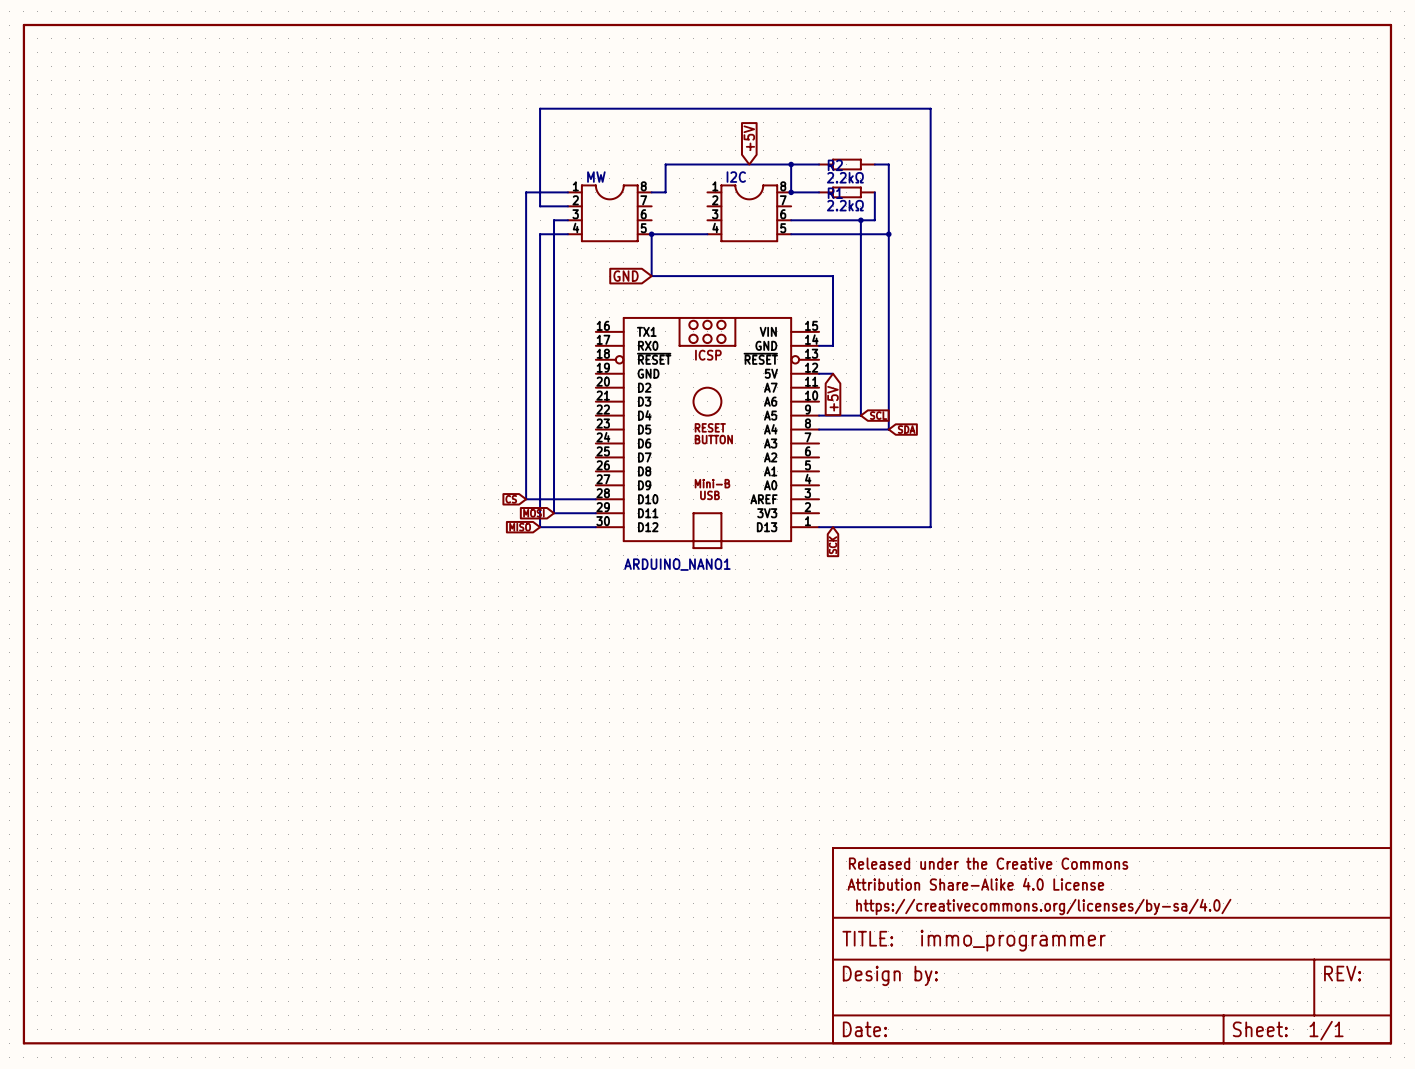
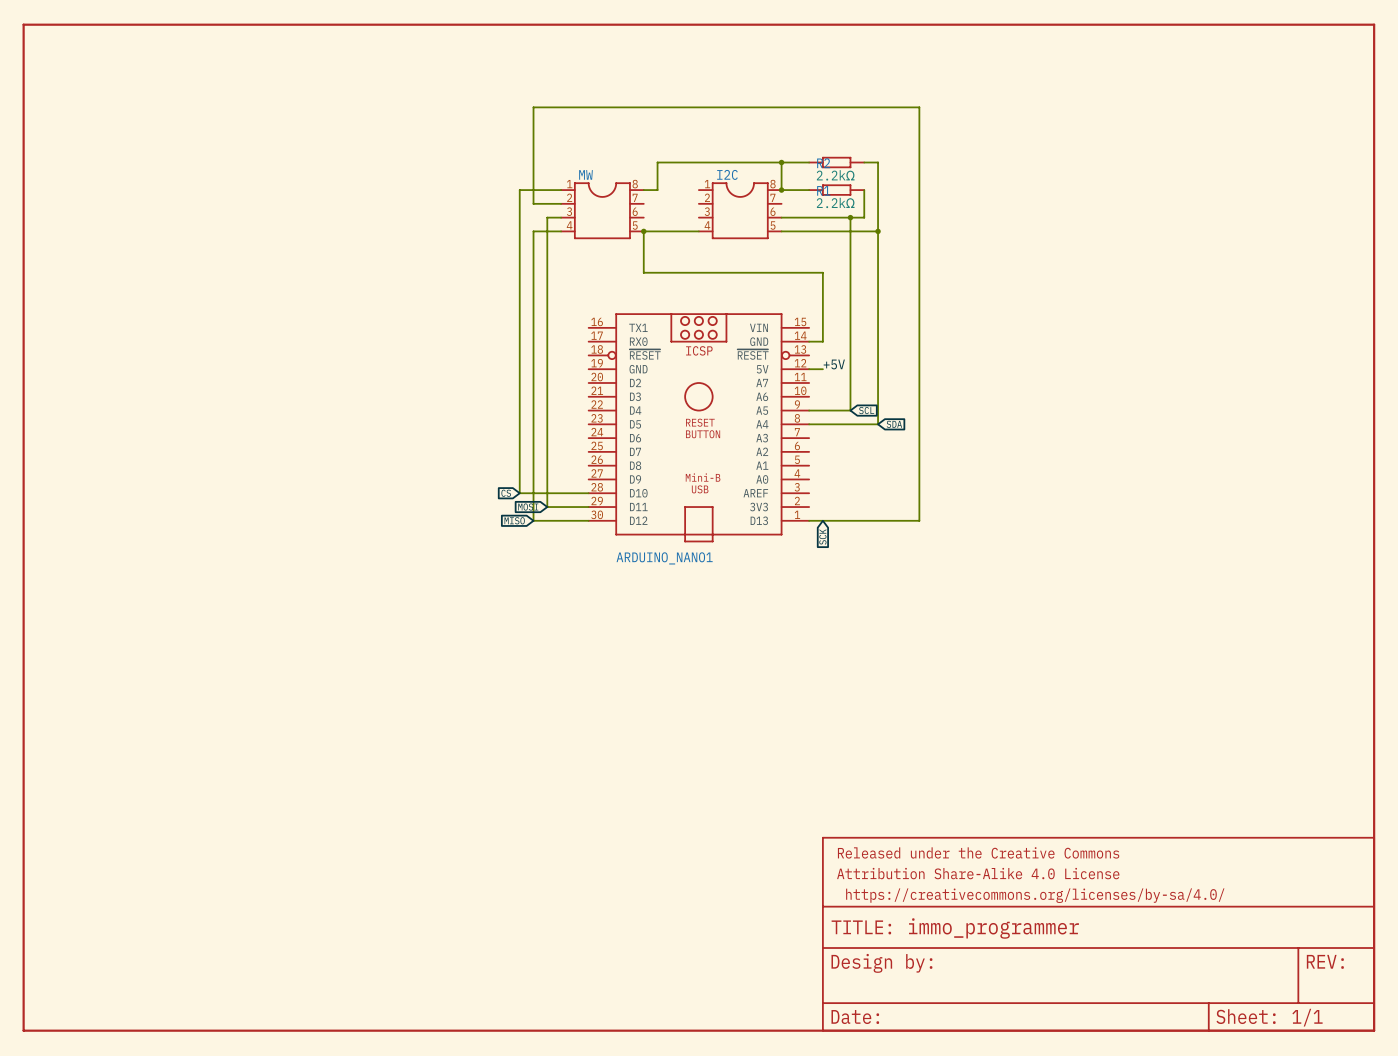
global label: +5V (749, 138) -> none
global label: GND (626, 276) -> none
label: none -> +5V (834, 364)
global label: +5V (833, 398) -> none

